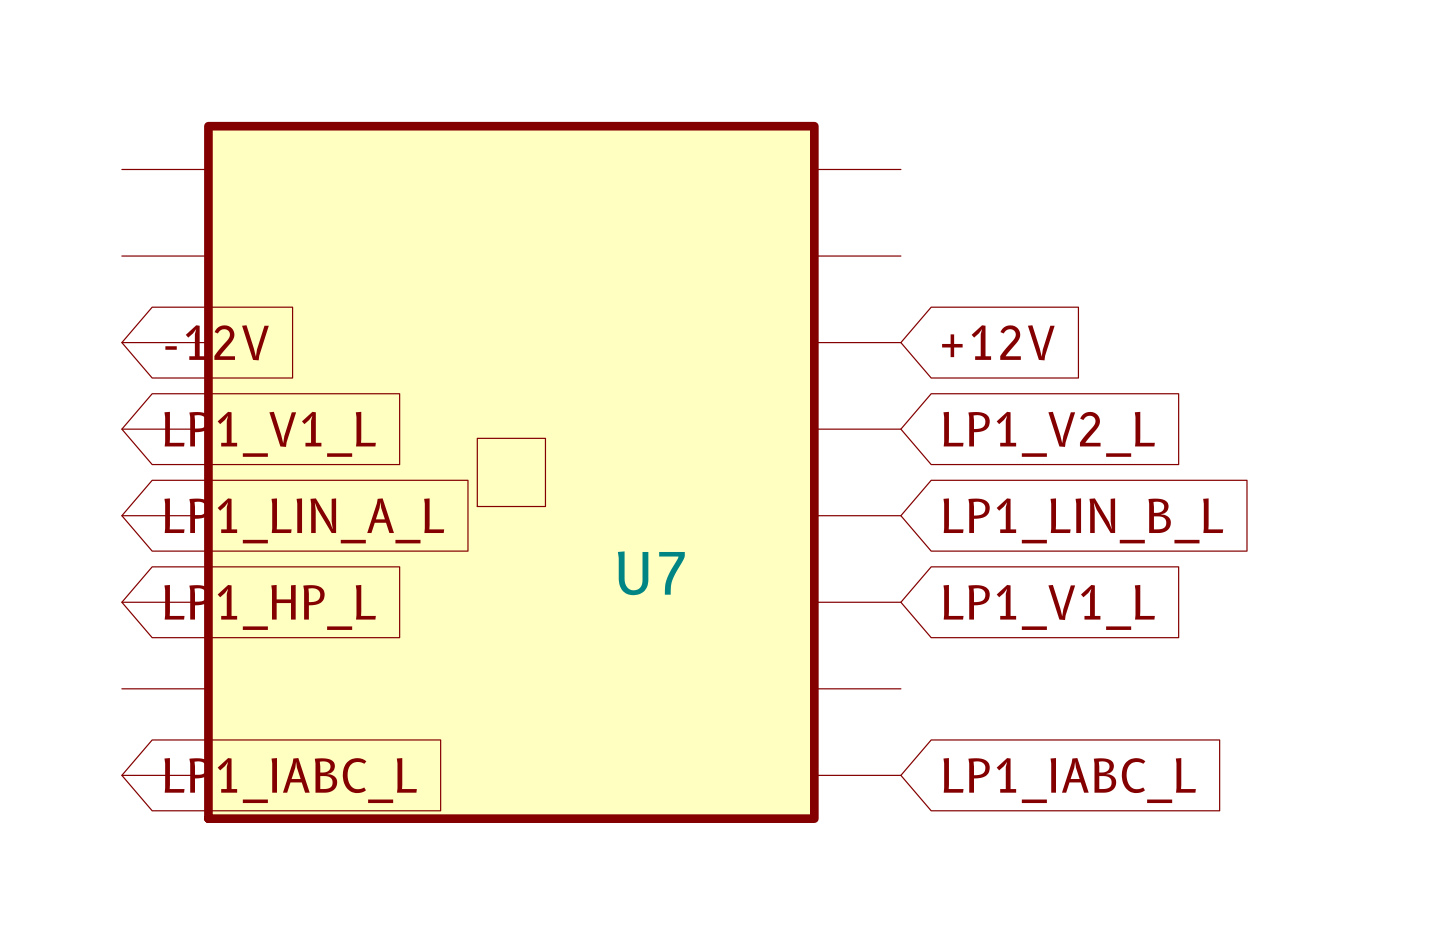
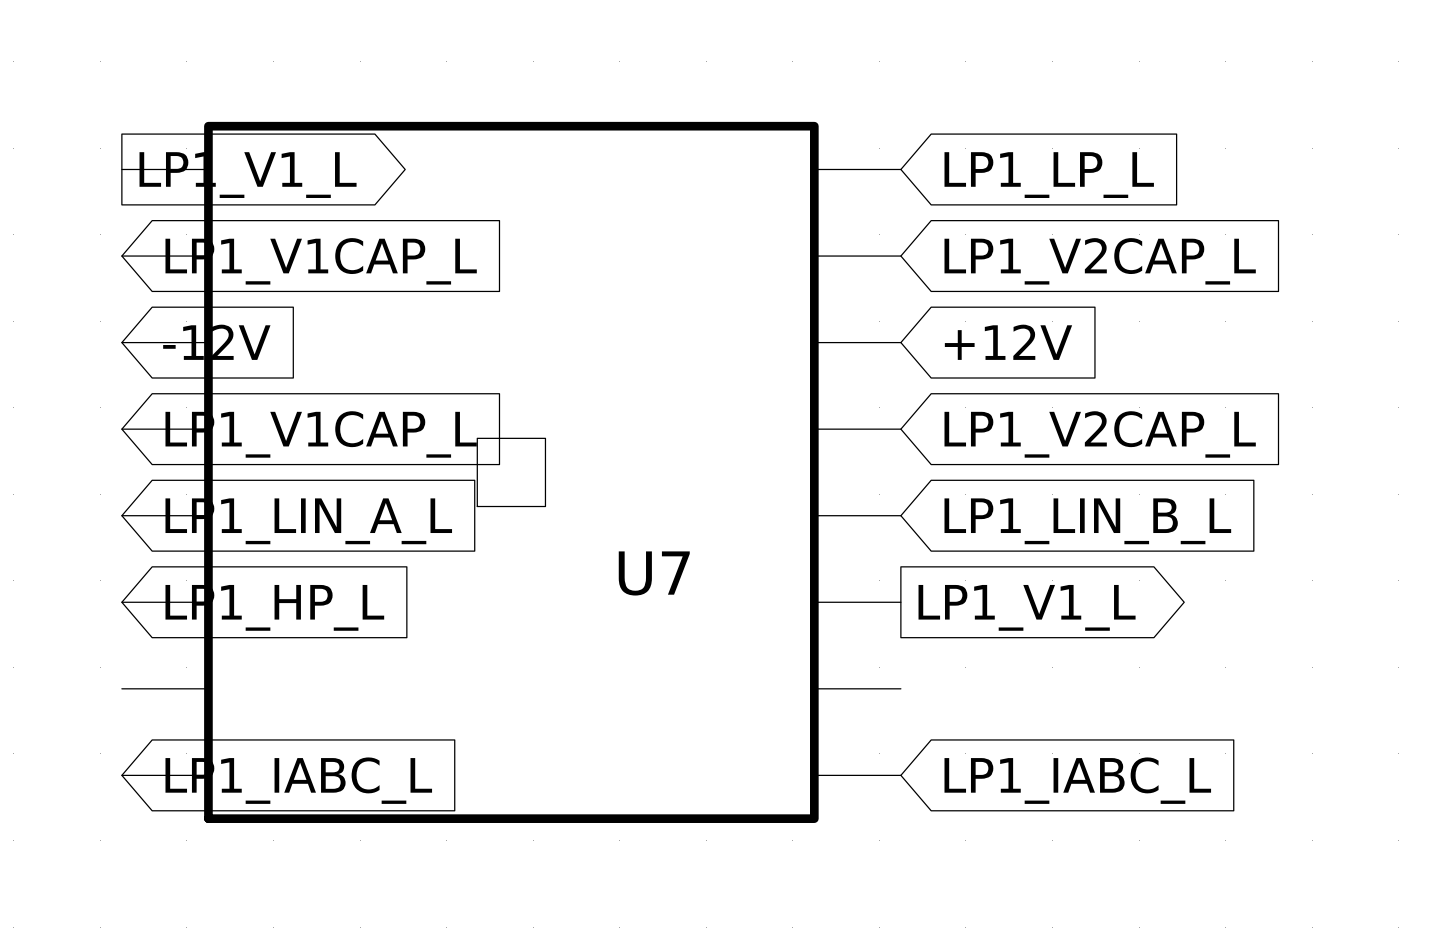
global label: none -> LP1_V1_L (248, 175)
global label: none -> LP1_LP_L (1049, 175)
global label: none -> LP1_V1CAP_L (321, 261)
global label: none -> LP1_V2CAP_L (1100, 261)
global label: LP1_V1_L (270, 434) -> LP1_V1CAP_L (321, 434)
global label: LP1_V2_L (1049, 434) -> LP1_V2CAP_L (1100, 434)
global label shape: input (1049, 607) -> output (1027, 607)

